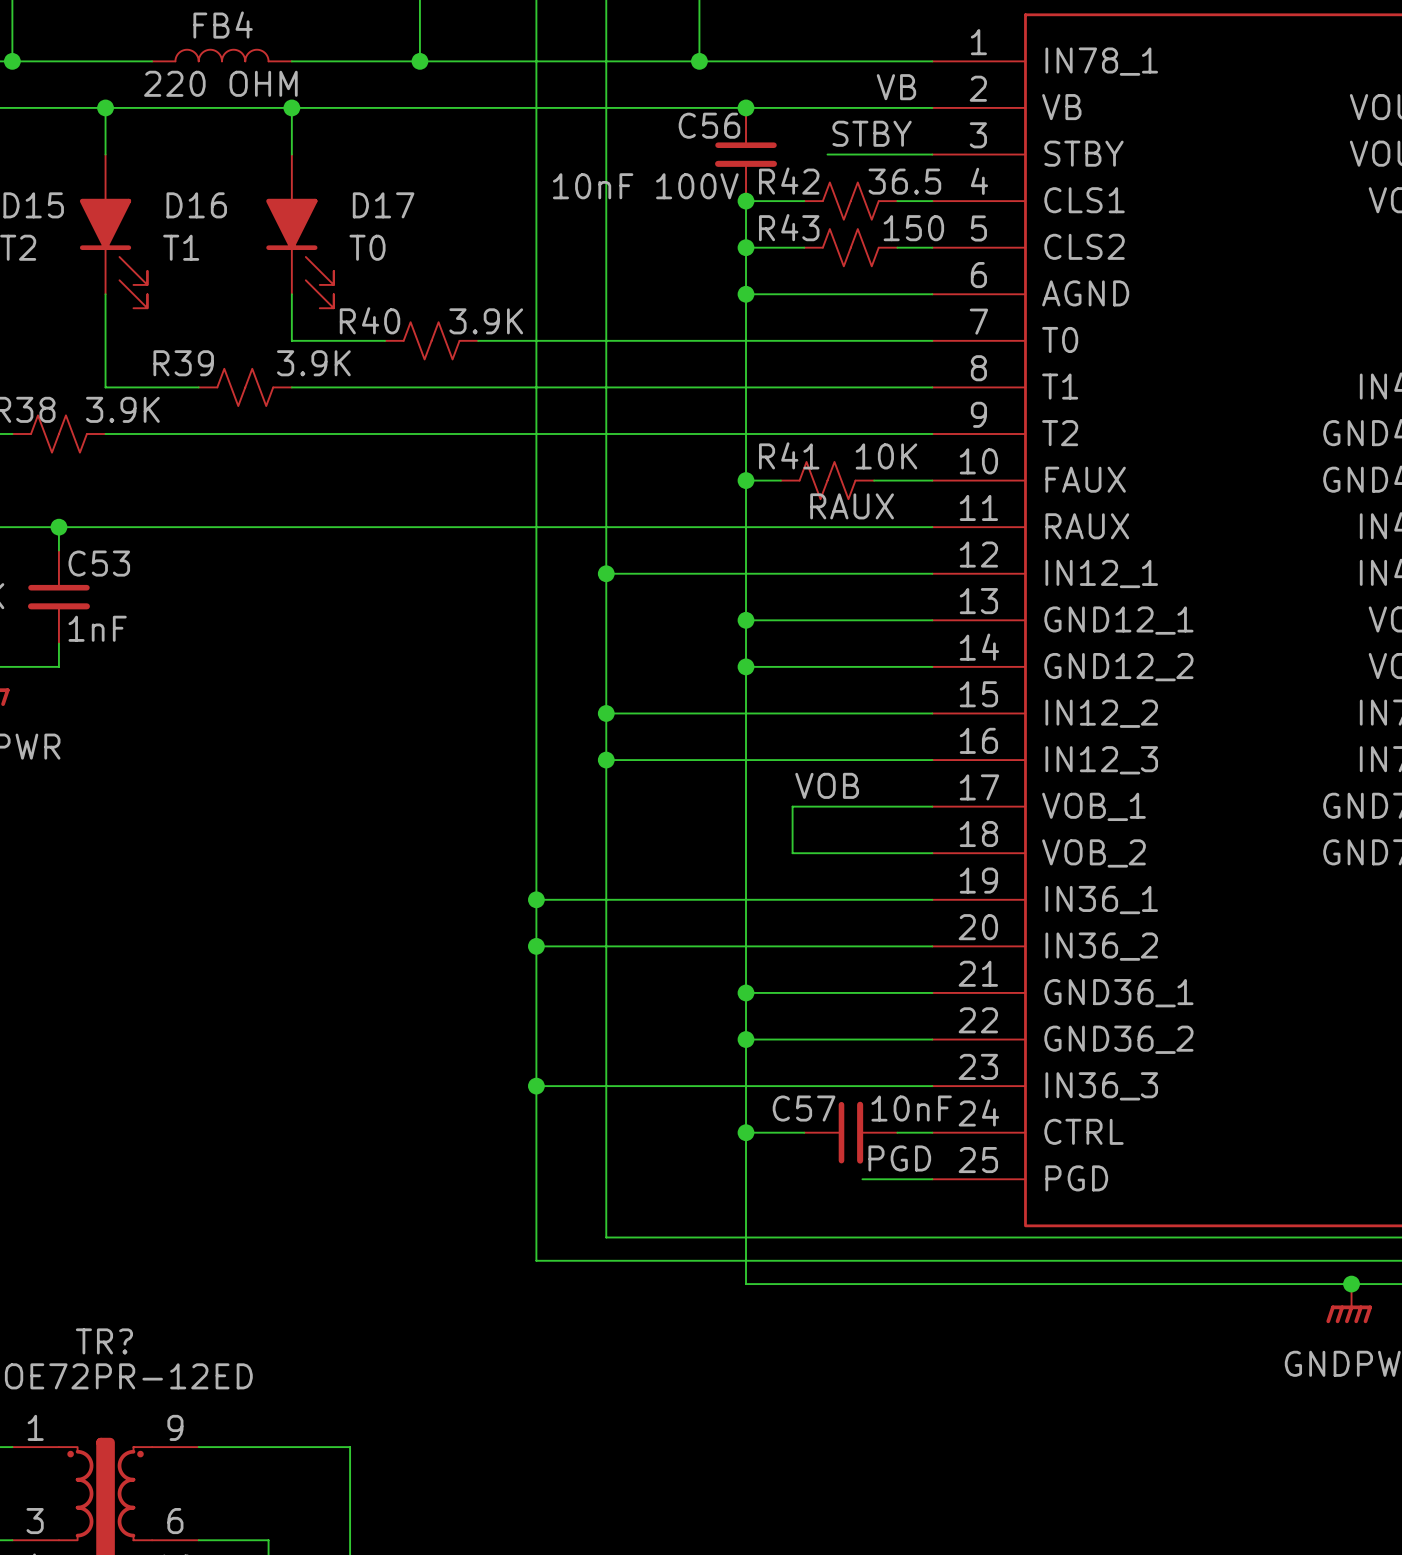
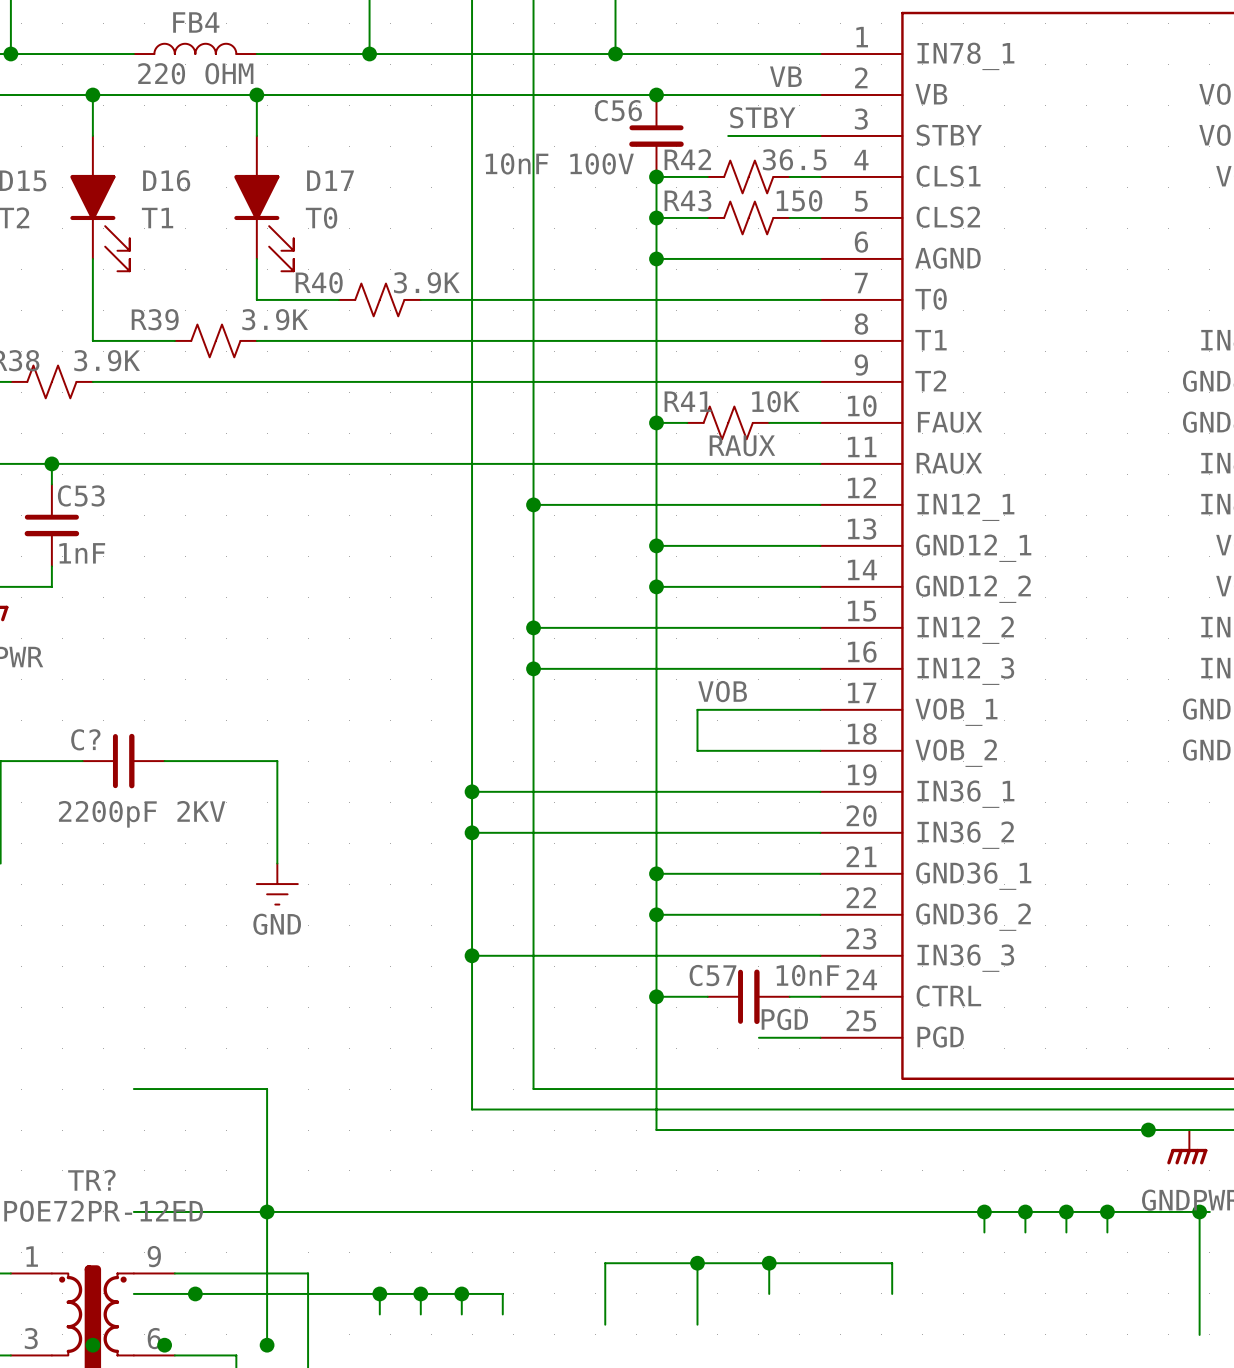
wire: none -> (82, 761) (0, 761) (0, 863)
C?: none -> 2200pF 2KV (123, 761)
wire: none -> (164, 761) (277, 761) (277, 863)
power symbol: none -> GND (277, 884)
wire: none -> (133, 1089) (267, 1089) (267, 1345)
junction position: (1351, 1284) -> (1148, 1130)
wire: none -> (133, 1211) (1209, 1211)
junction: none -> (267, 1211)
wire: none -> (984, 1211) (984, 1232)
junction: none -> (984, 1211)
wire: none -> (1025, 1211) (1025, 1232)
junction: none -> (1025, 1211)
wire: none -> (1066, 1211) (1066, 1232)
junction: none -> (1066, 1211)
wire: none -> (1107, 1211) (1107, 1232)
junction: none -> (1107, 1211)
wire: none -> (1199, 1211) (1199, 1334)
junction: none -> (1199, 1211)
wire: none -> (697, 1263) (697, 1324)
junction: none -> (697, 1263)
wire: none -> (769, 1263) (769, 1293)
junction: none -> (769, 1263)
wire: none -> (133, 1293) (502, 1293) (502, 1314)
junction: none -> (195, 1293)
wire: none -> (379, 1293) (379, 1314)
junction: none -> (379, 1293)
wire: none -> (420, 1293) (420, 1314)
junction: none -> (420, 1293)
wire: none -> (461, 1293) (461, 1314)
junction: none -> (461, 1293)
wire: none -> (892, 1293) (892, 1263) (605, 1263) (605, 1324)
junction: none -> (92, 1345)
junction: none -> (164, 1345)
junction: none -> (267, 1345)

